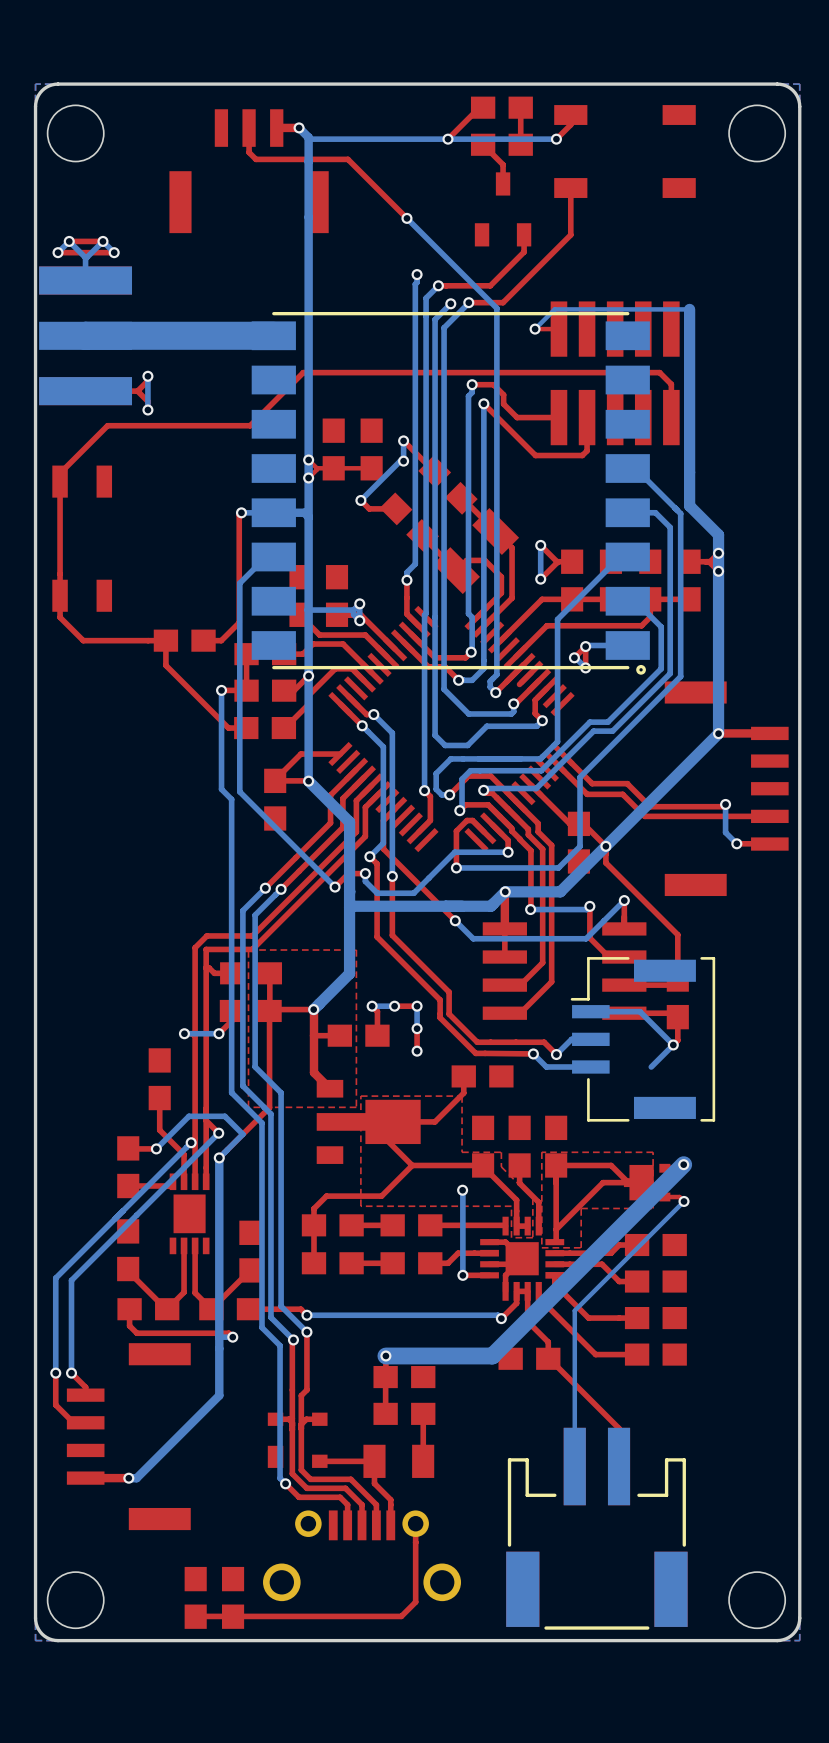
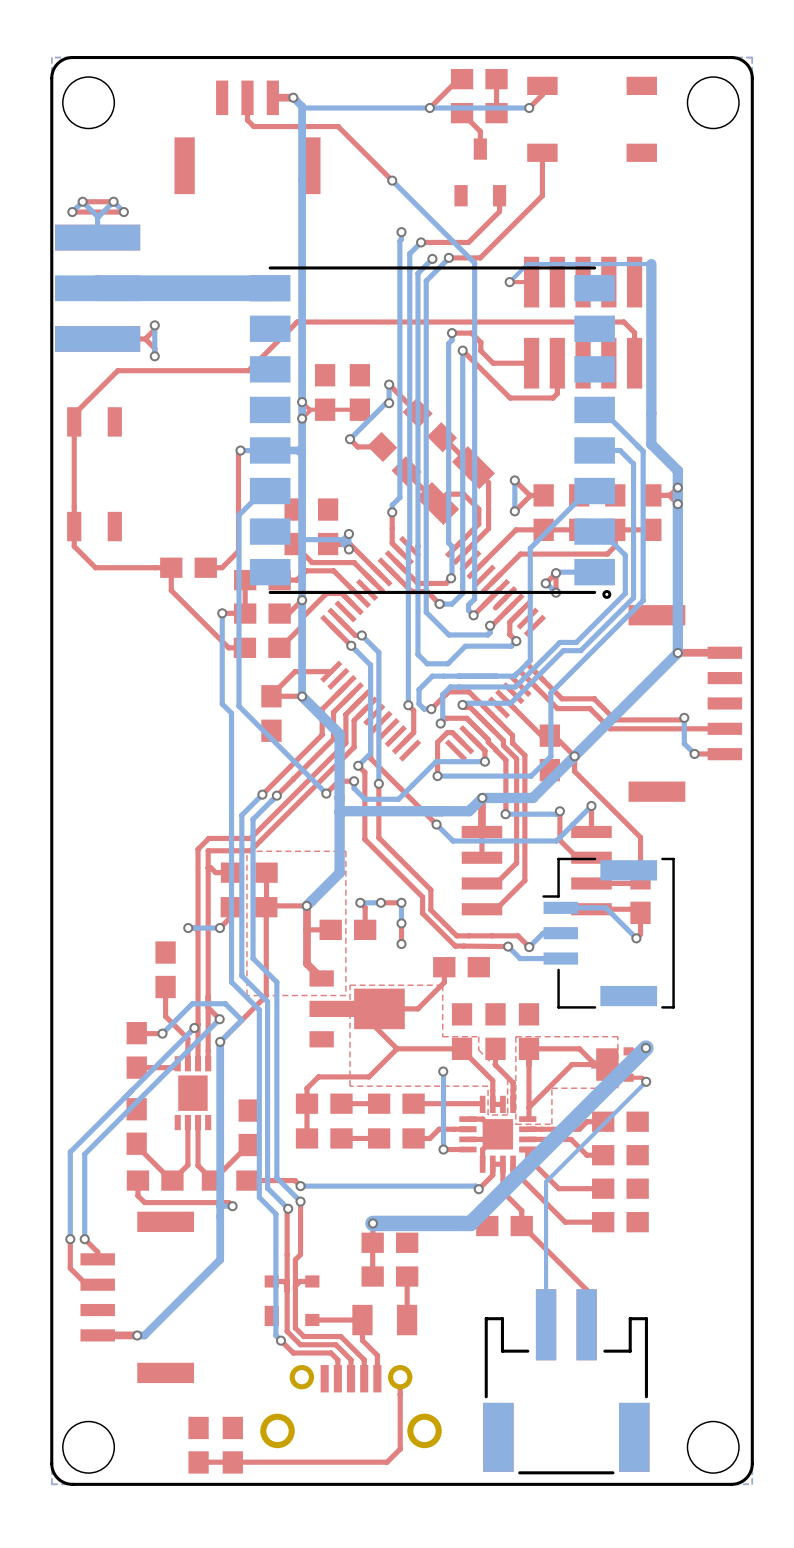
bottom track: (673, 1044) (651, 1067) -> none

